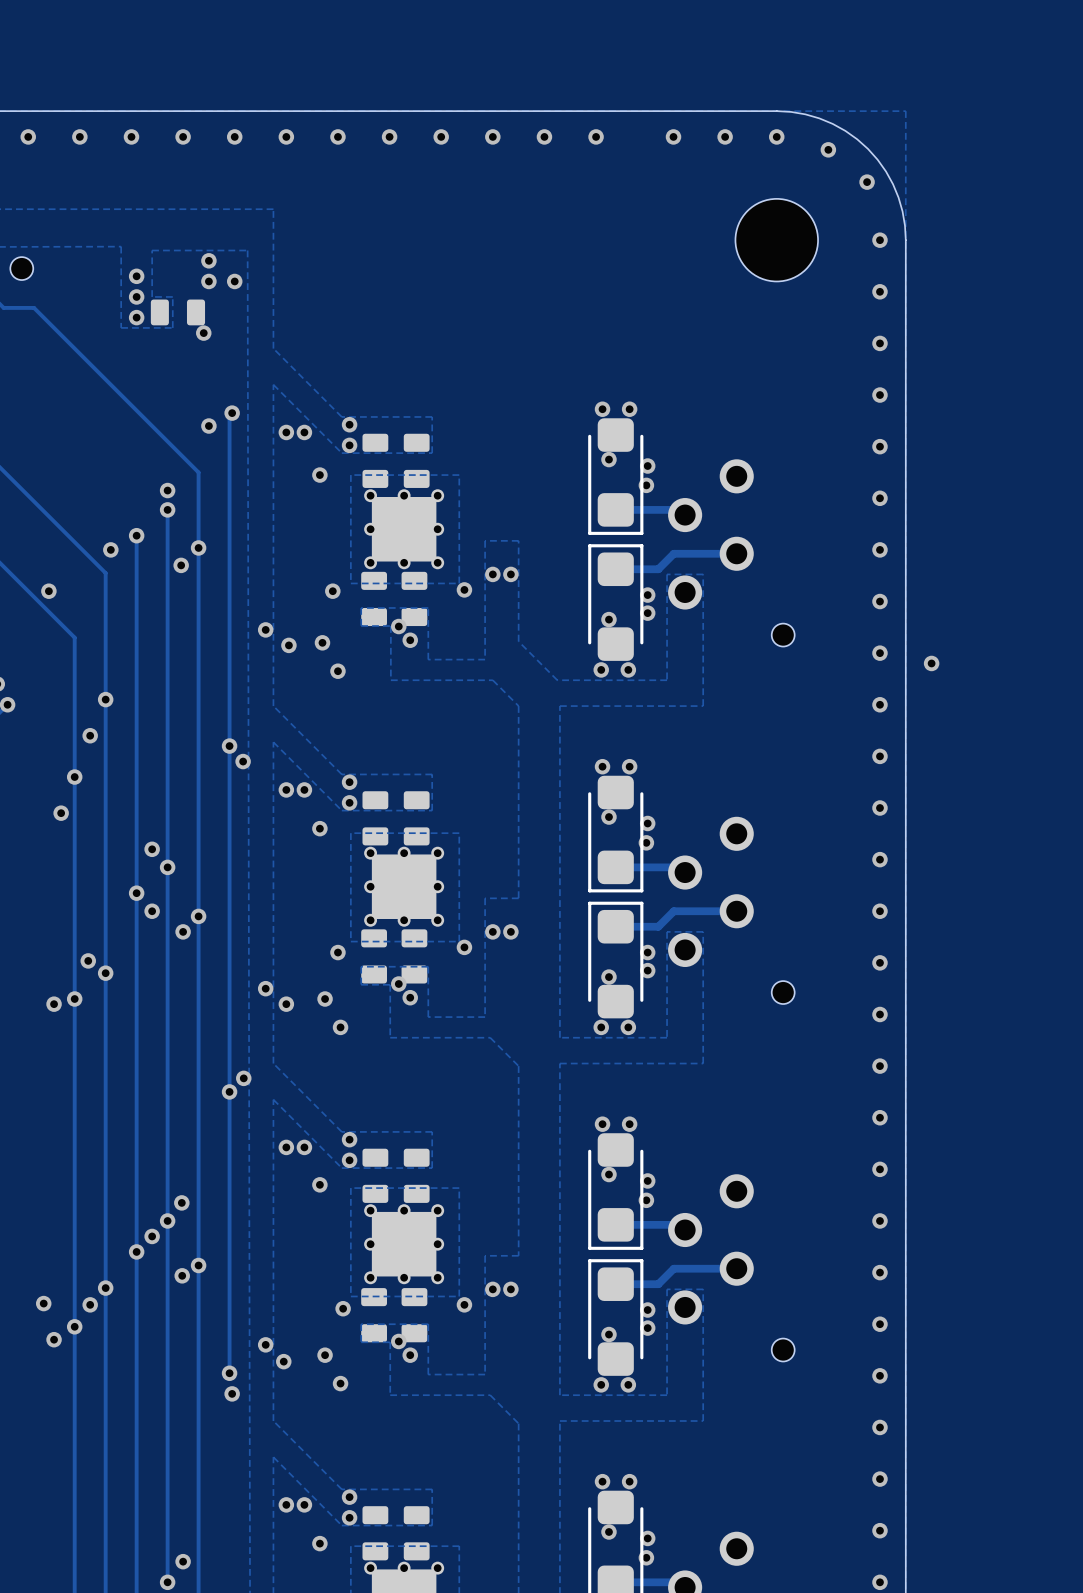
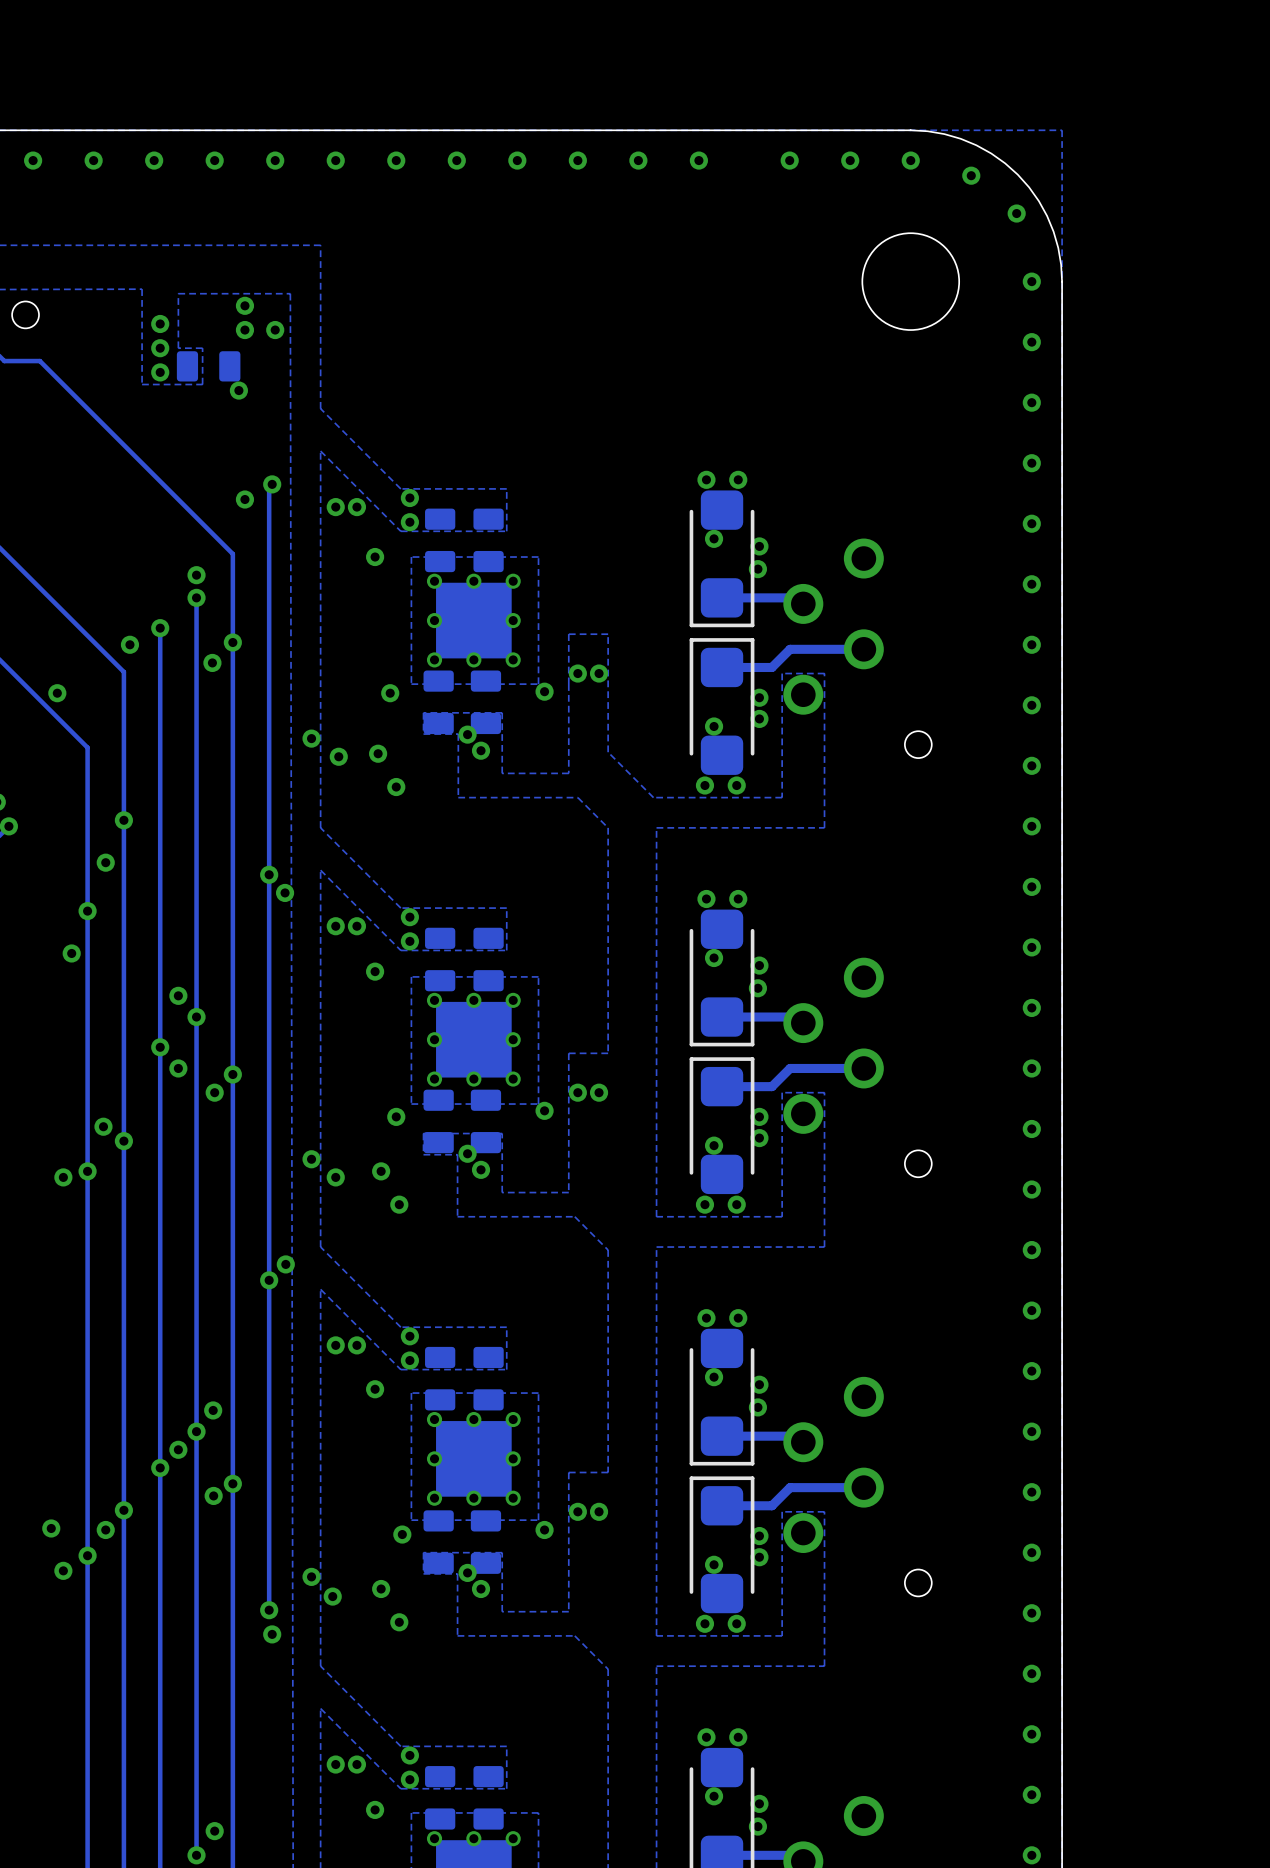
via: (931, 663) -> none

